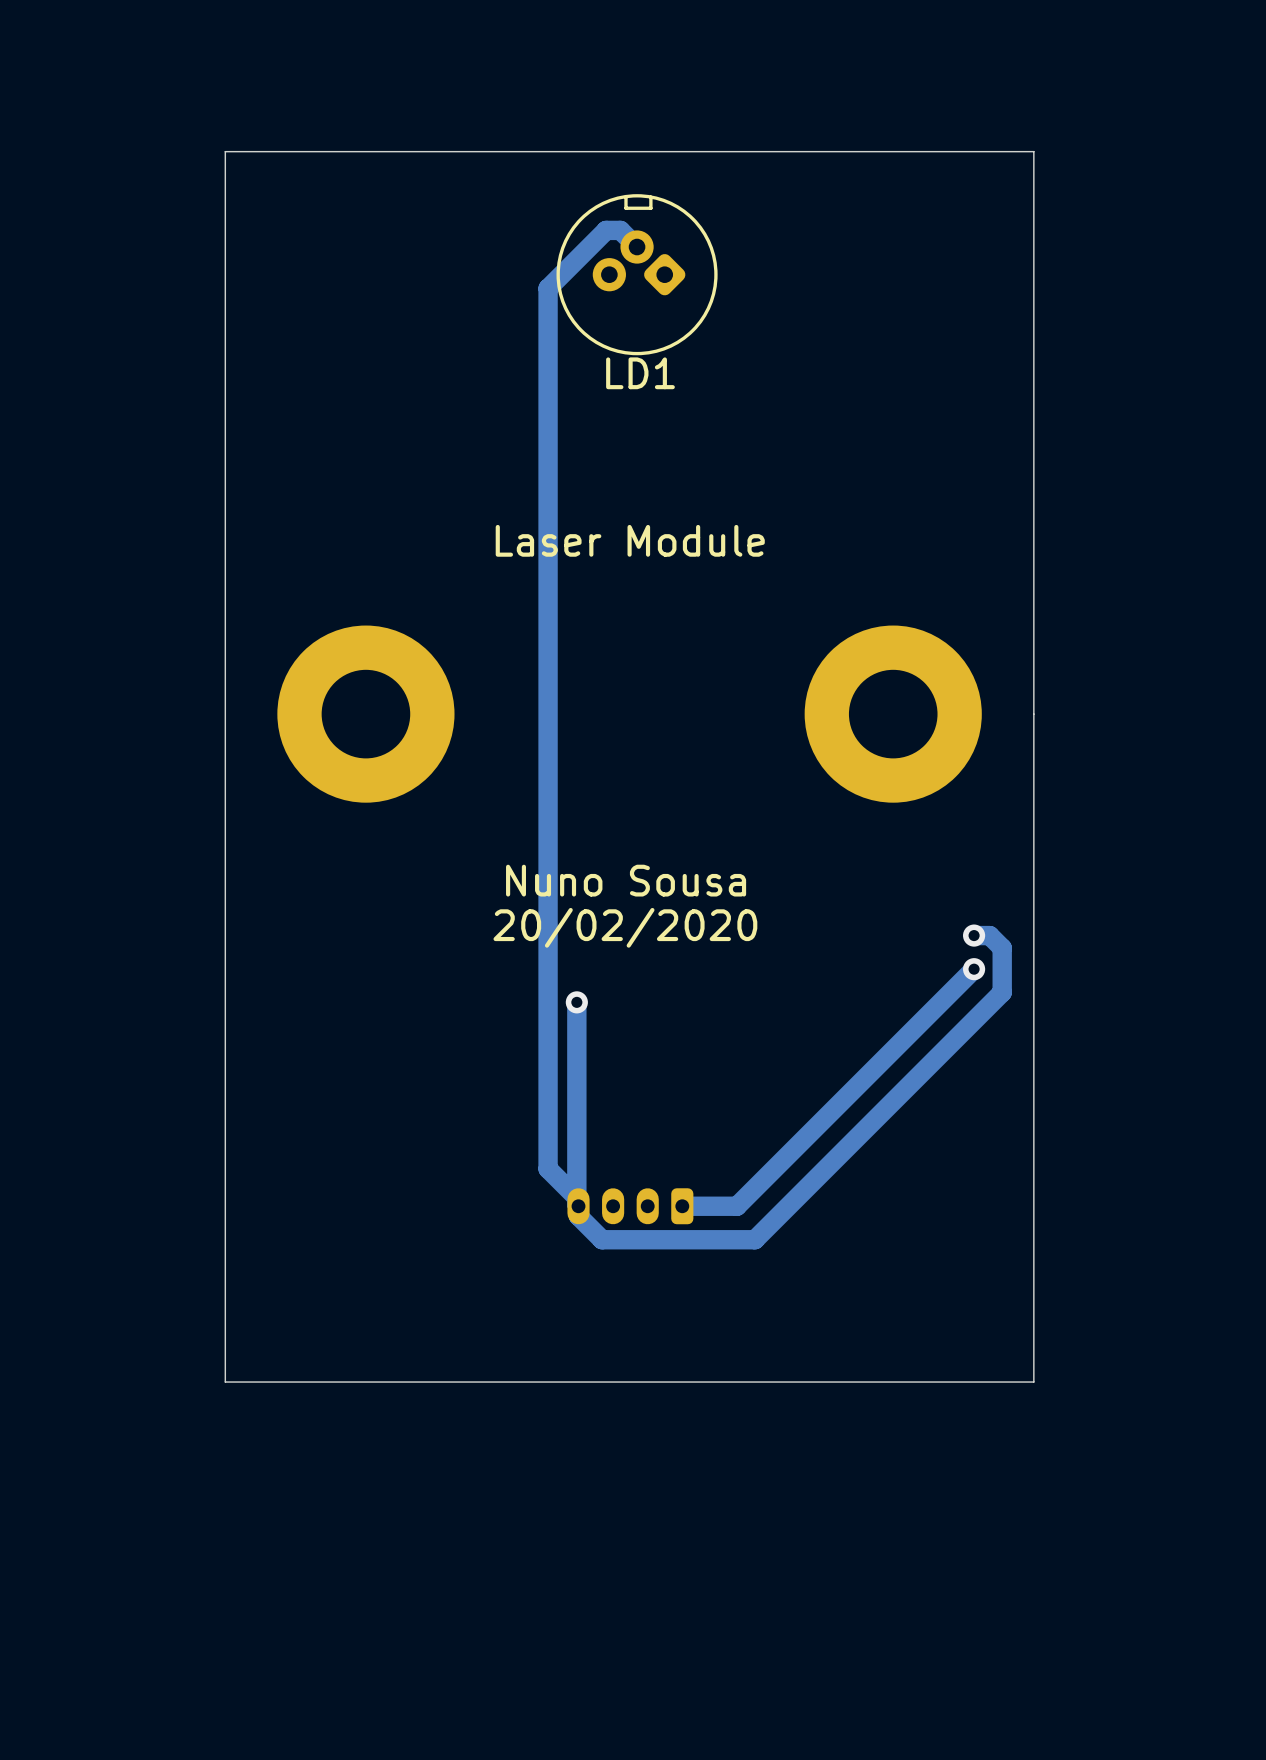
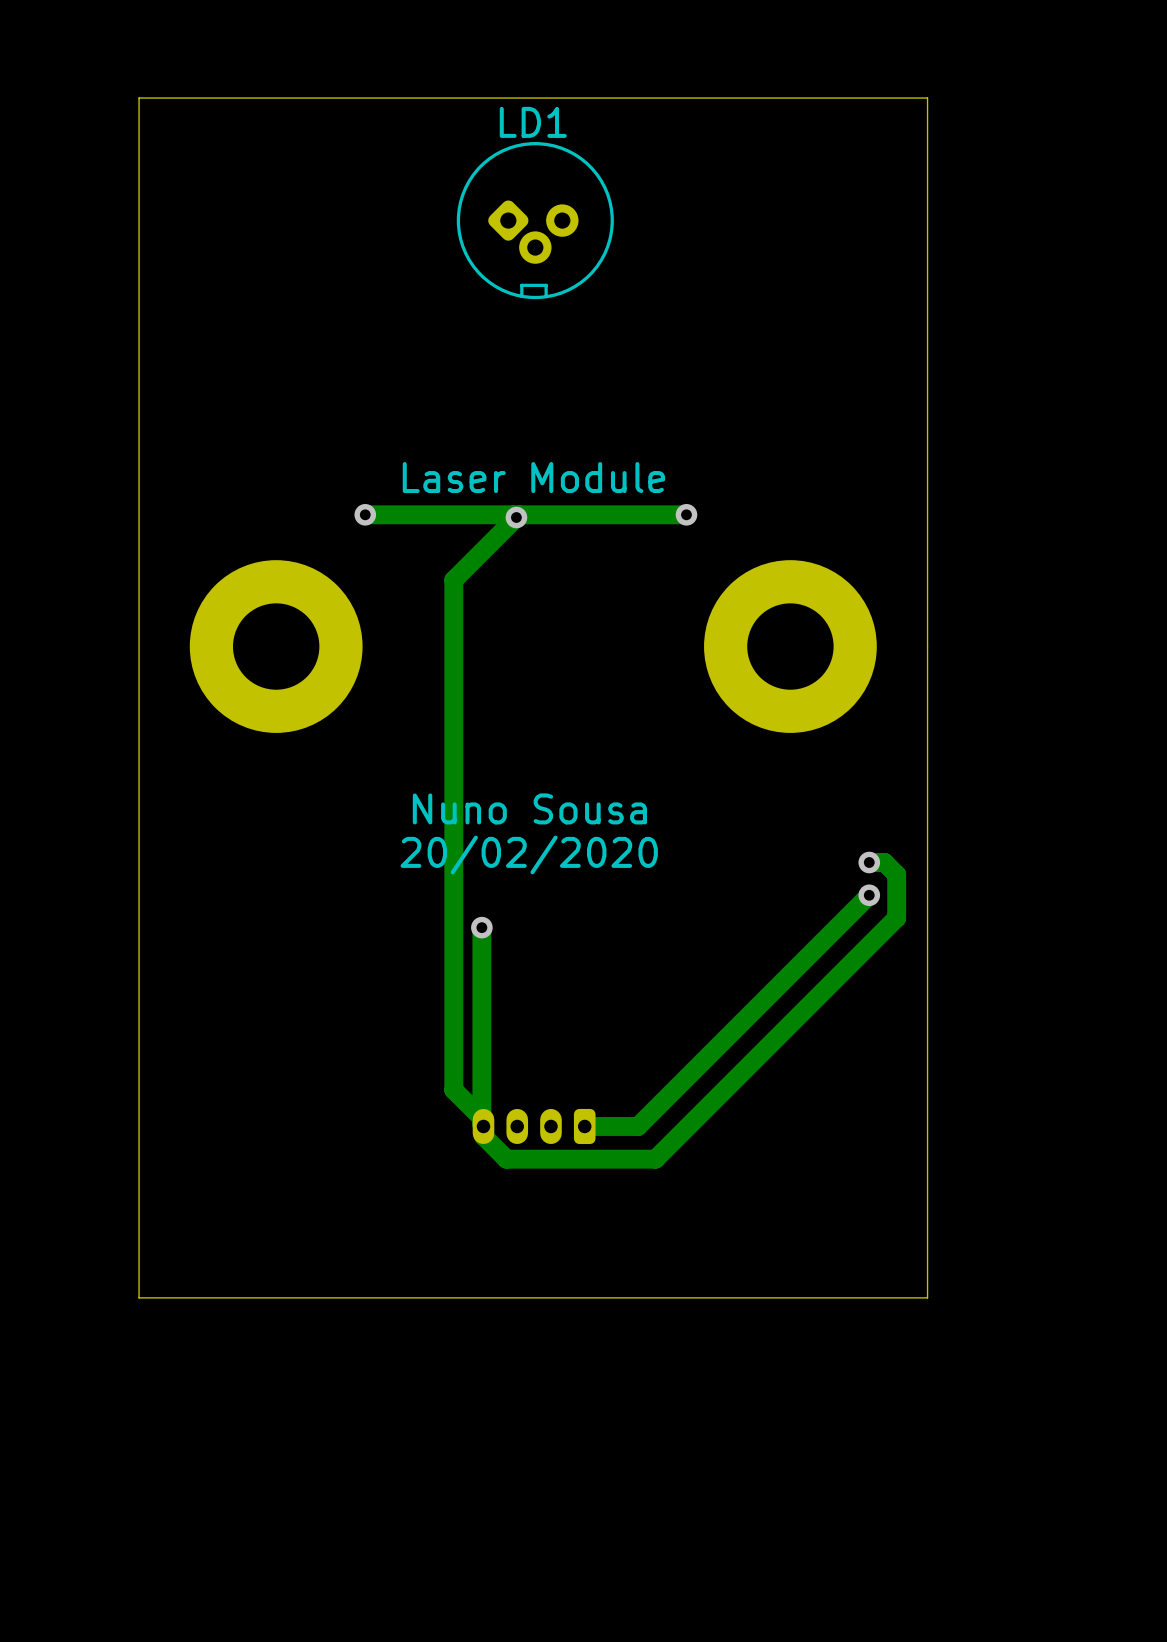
track: (637, 247) (620, 230) (606, 230) (548, 288) (548, 646) -> (686, 514) (519, 514) (453, 580)
LD1 rotation: 0° (637, 274) -> 180° (535, 220)
track: none -> (365, 514) (513, 514) (516, 517)
via: none -> (365, 514)
via: none -> (686, 514)
via: none -> (516, 517)

